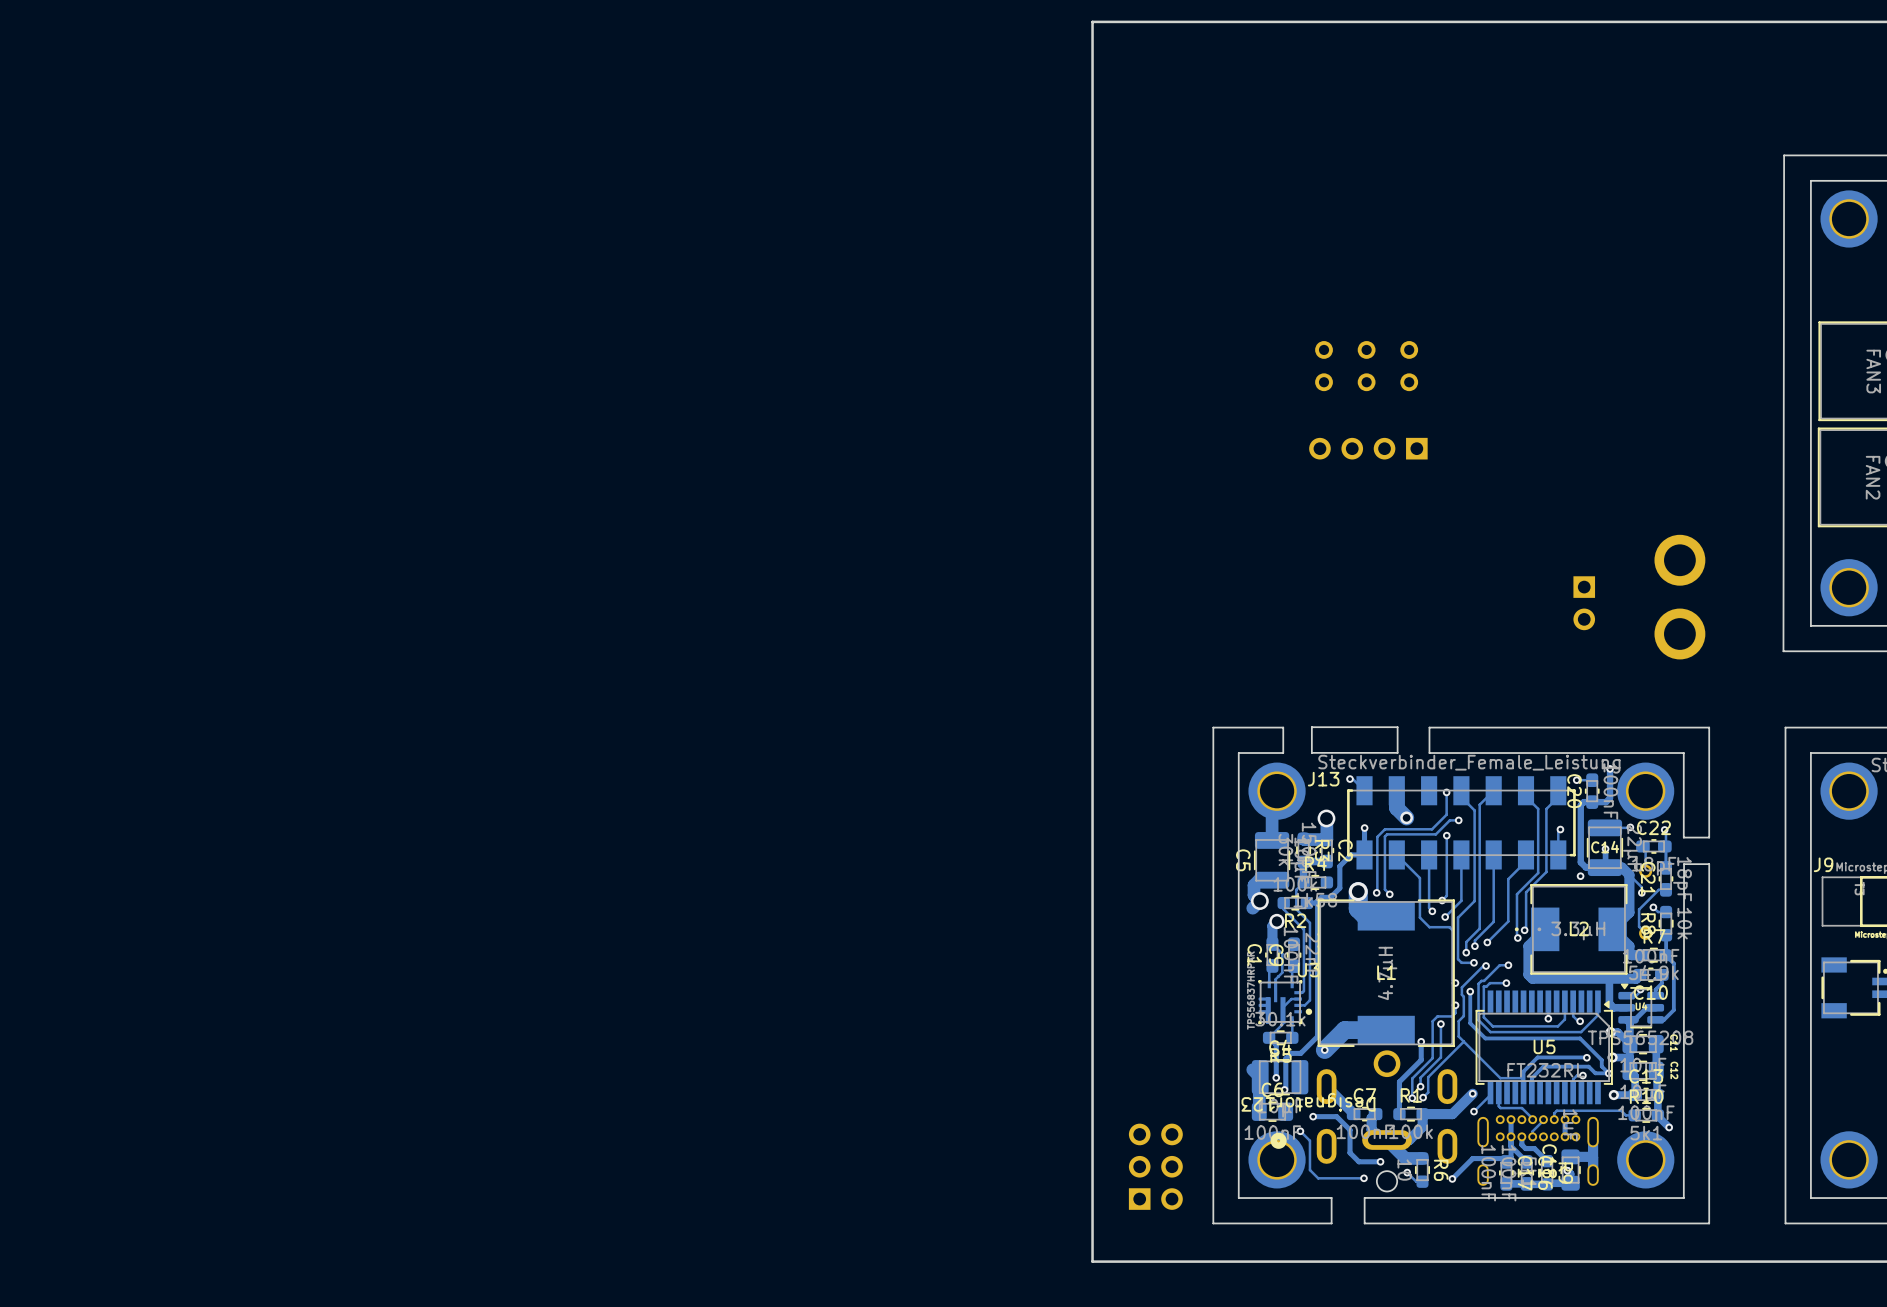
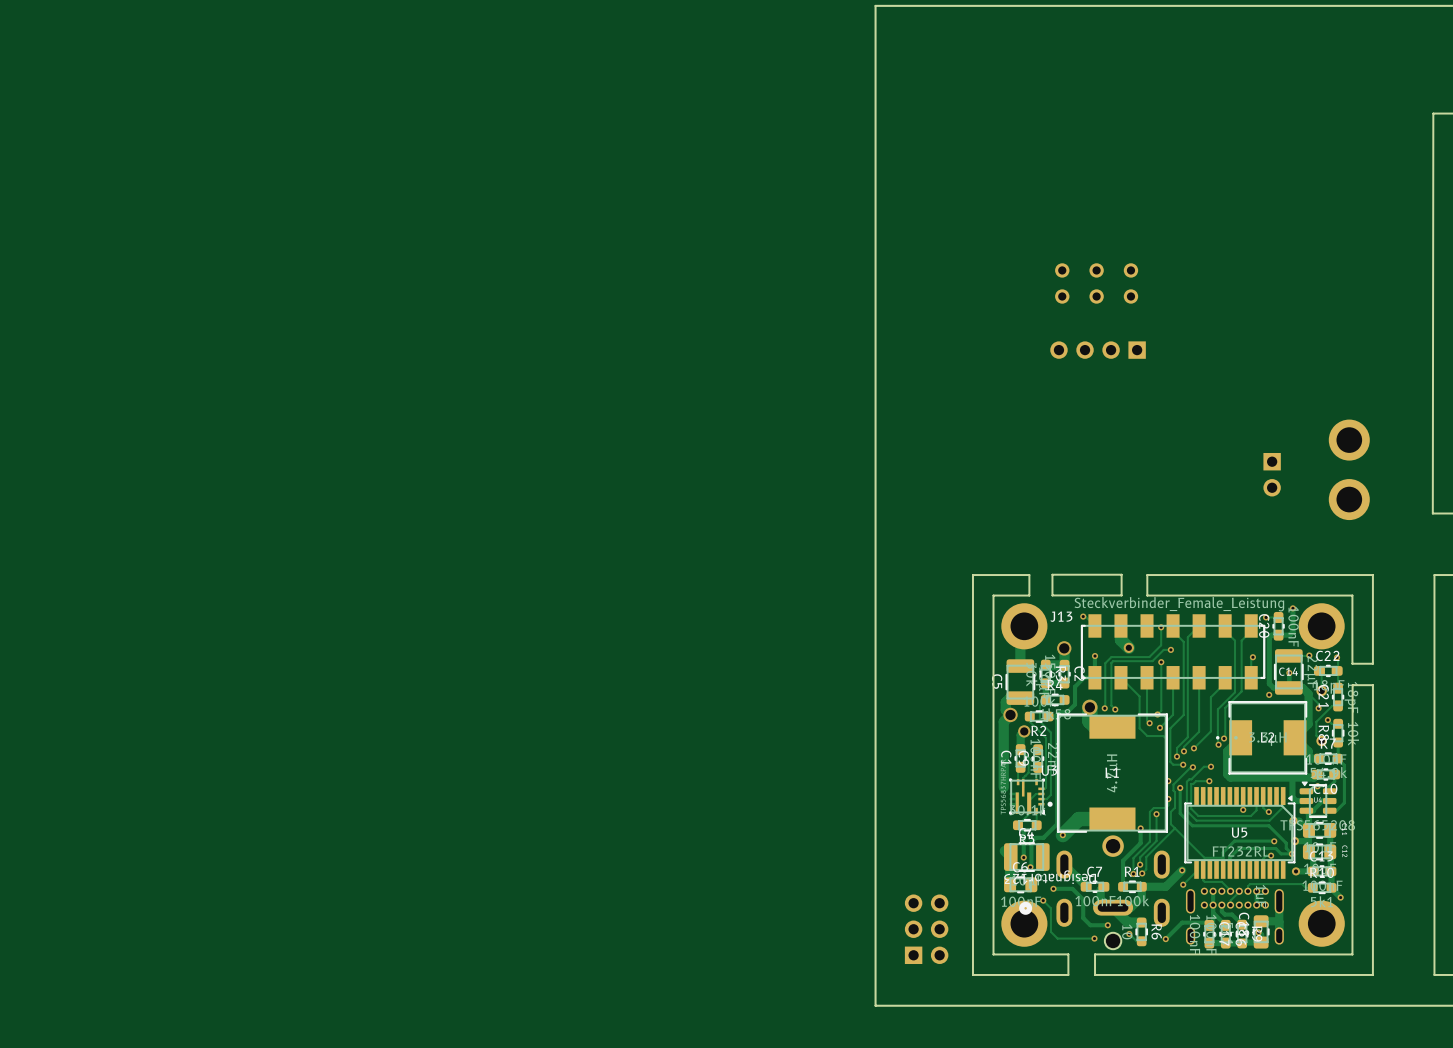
track: none -> (1004, 720) (1003, 787)

